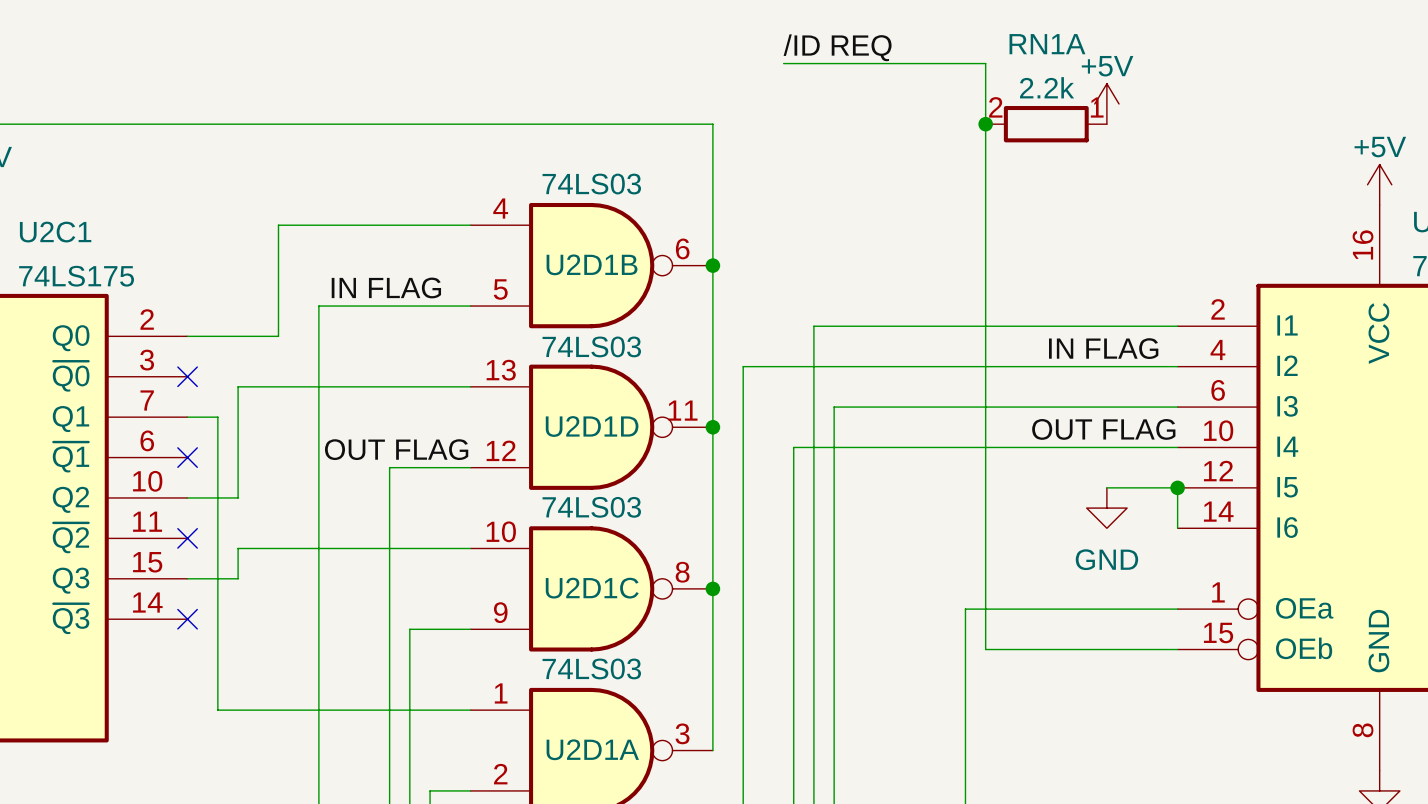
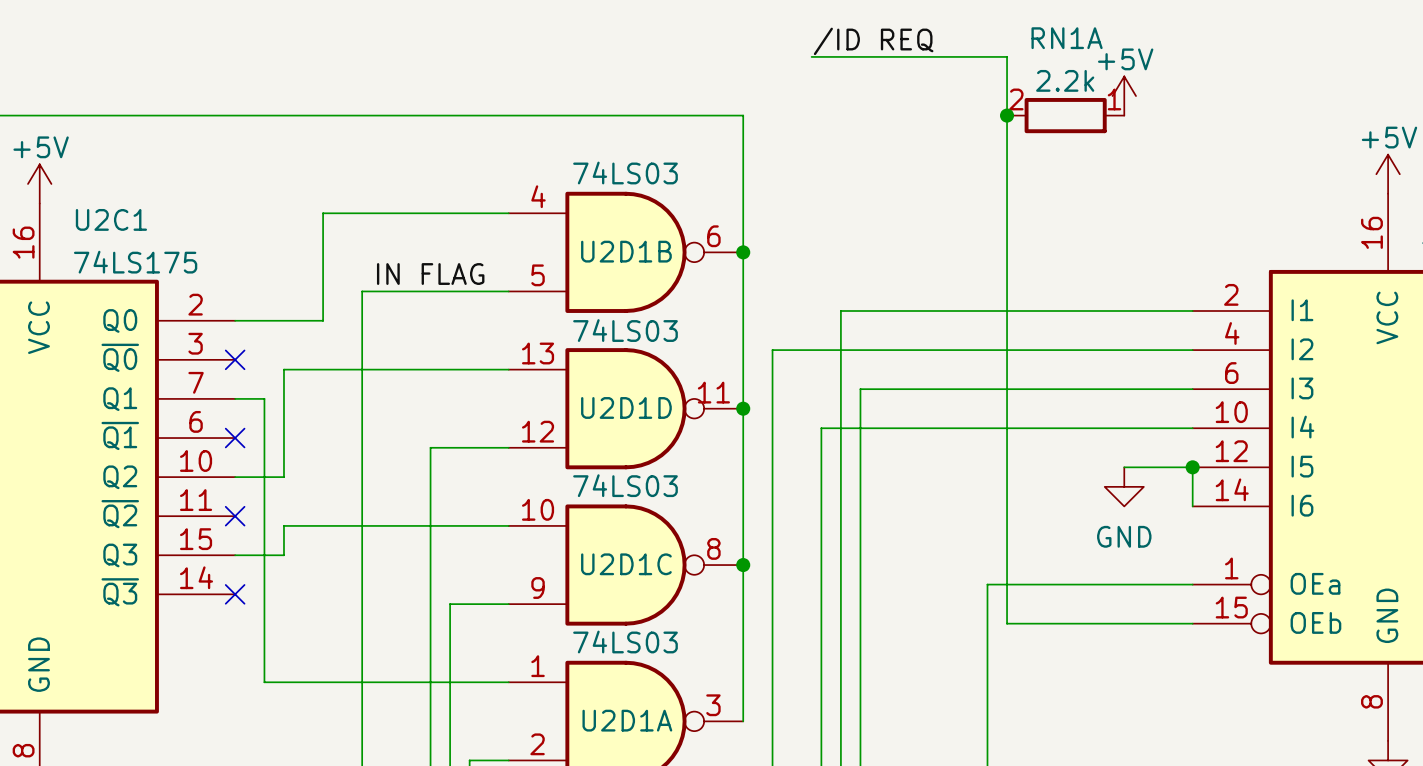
label: IN FLAG (1103, 348) -> none
label: OUT FLAG (1103, 429) -> none
label: OUT FLAG (396, 449) -> none

